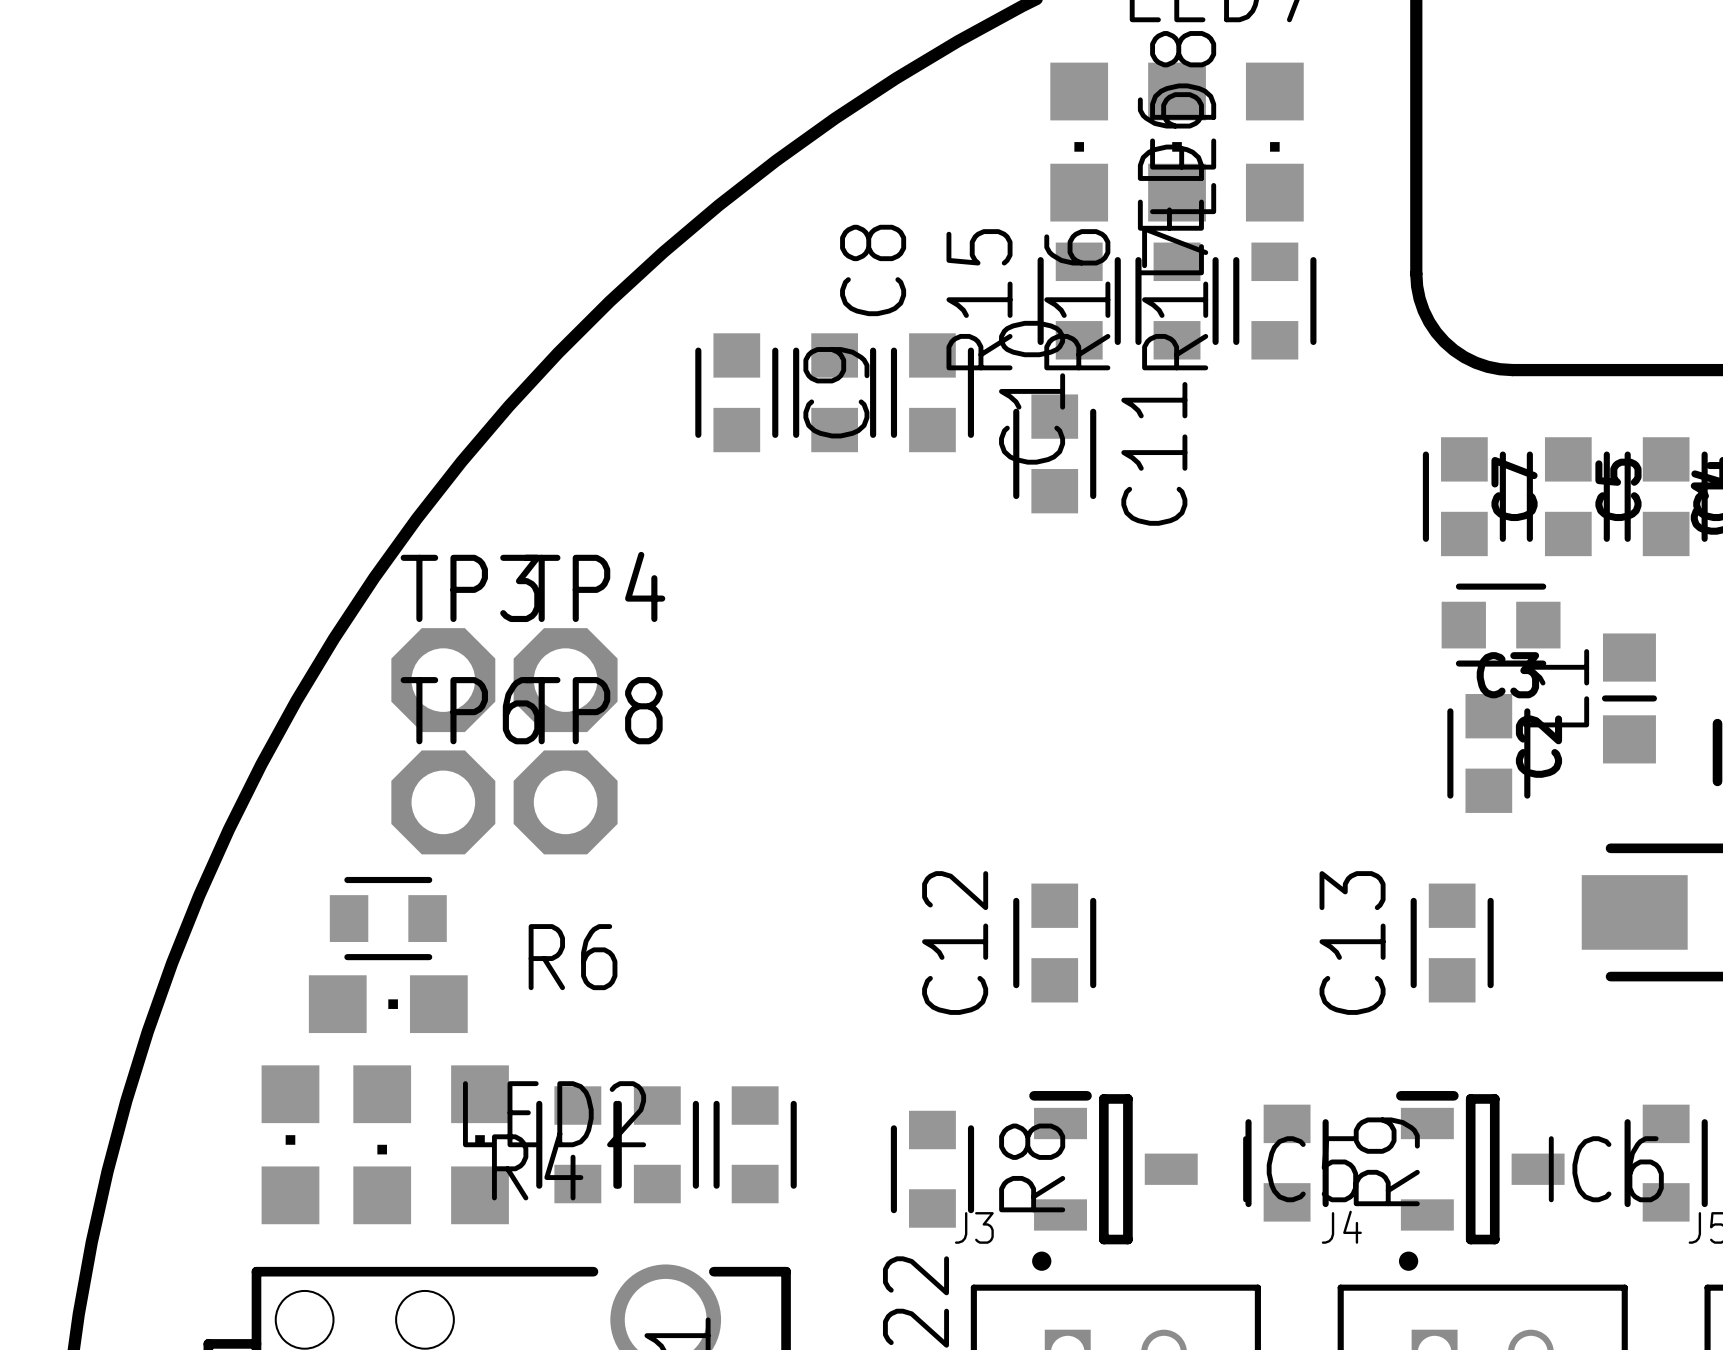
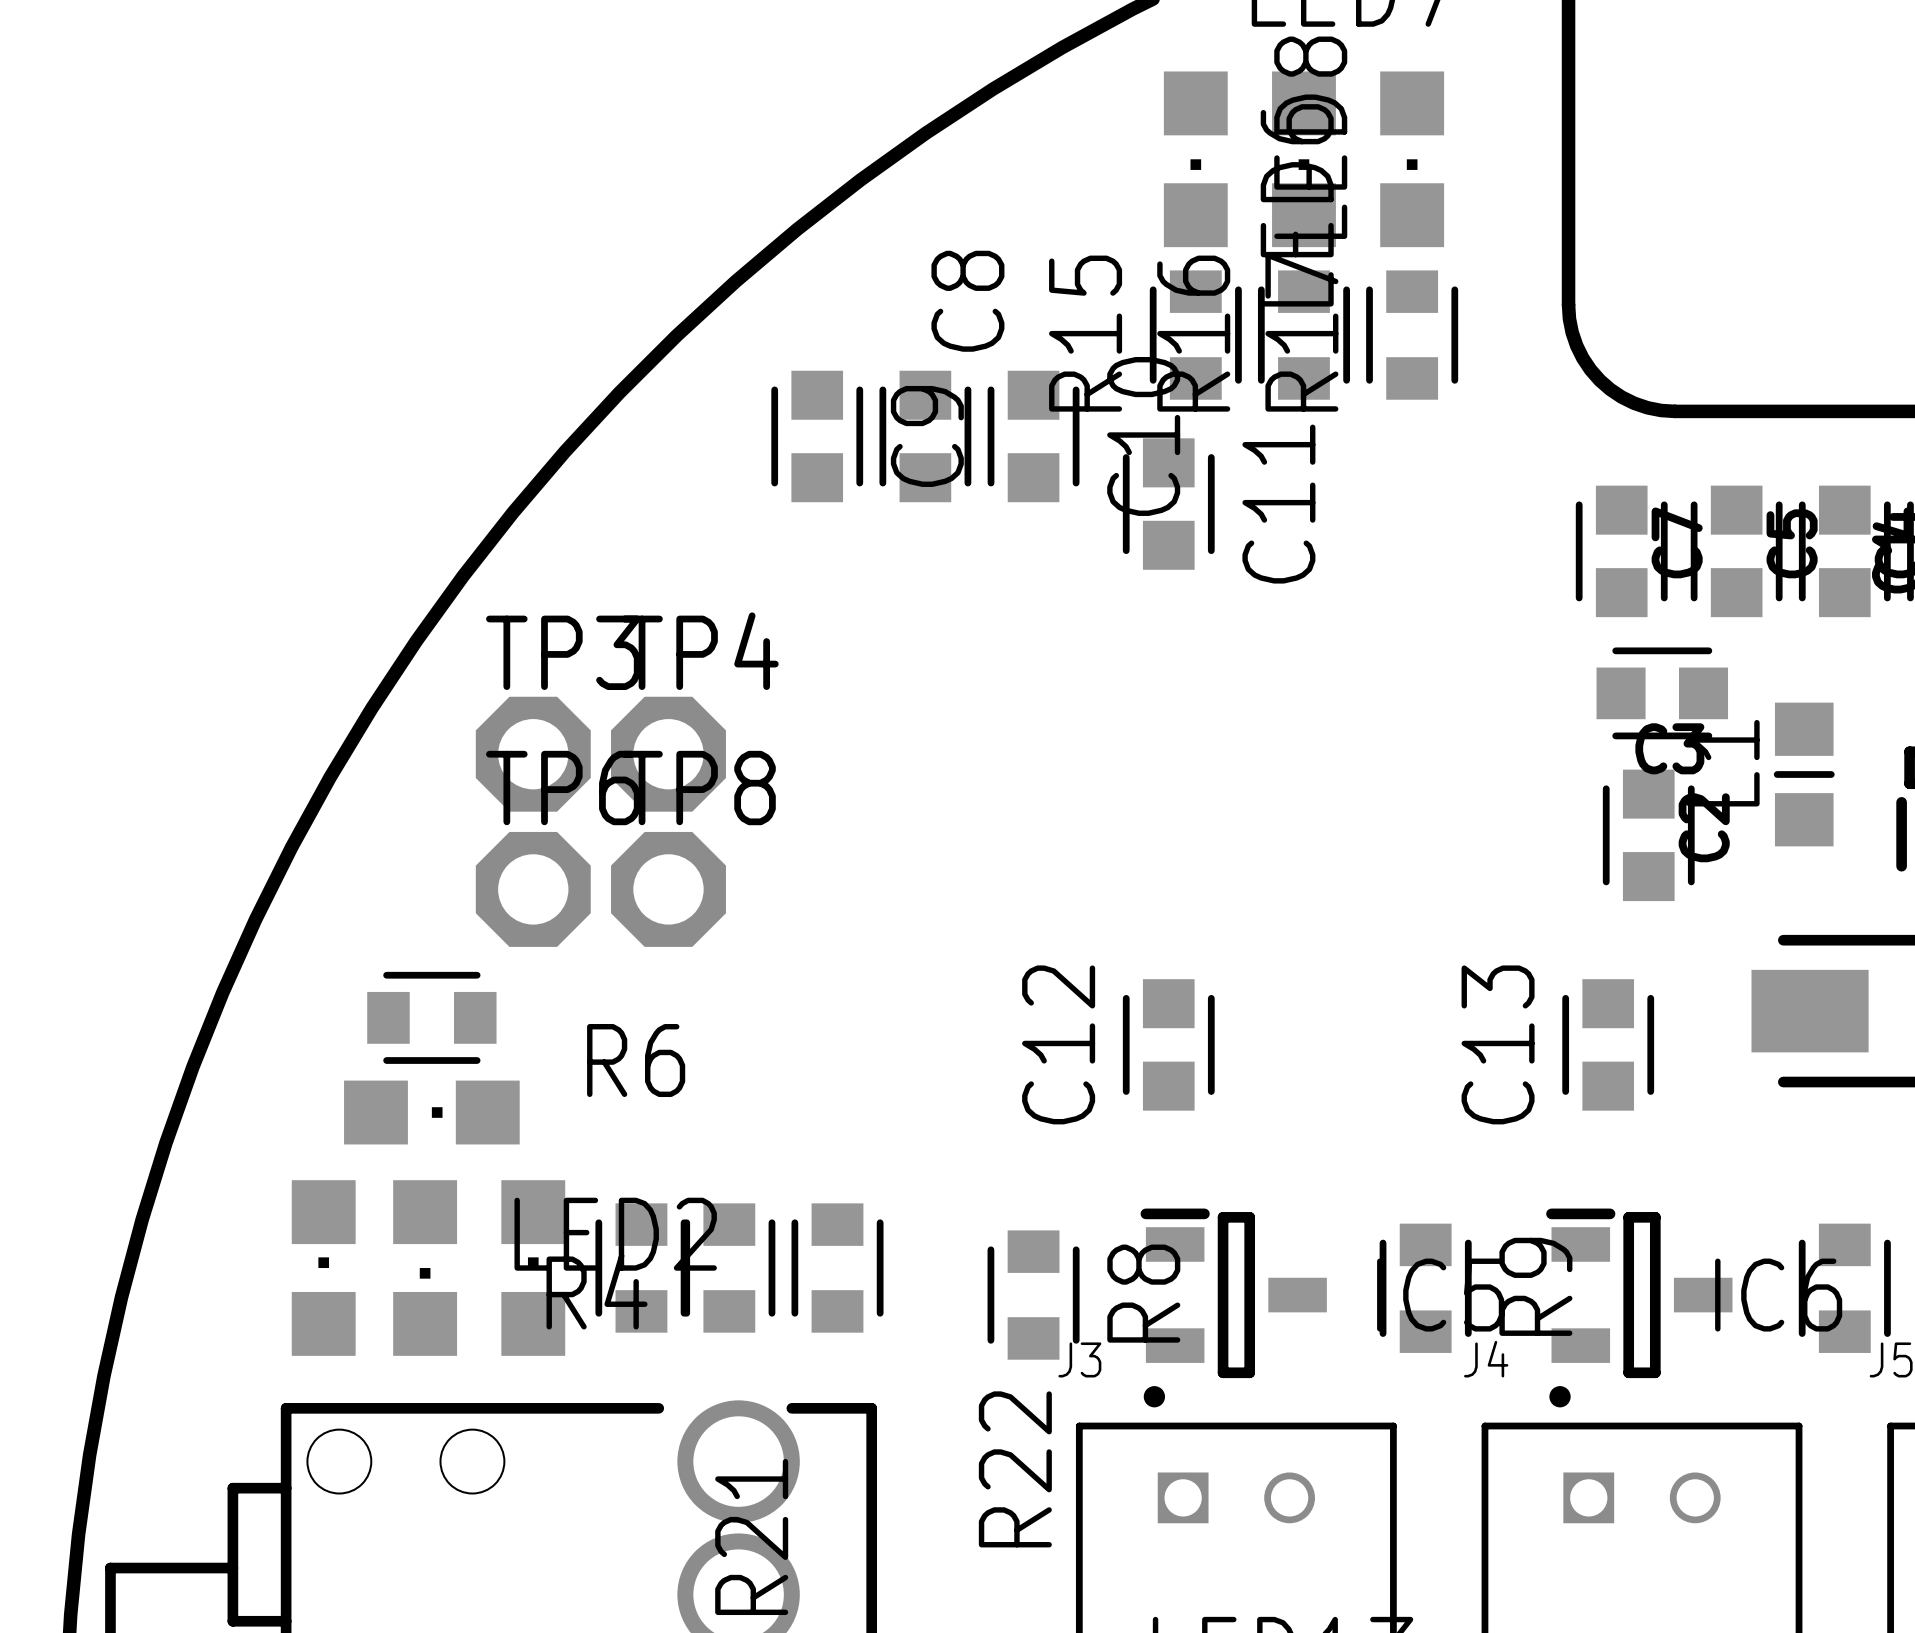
TP3 position: (443, 680) -> (533, 754)
TP4 position: (565, 680) -> (668, 754)
TP6 position: (443, 802) -> (533, 889)
TP8 position: (565, 802) -> (668, 889)

